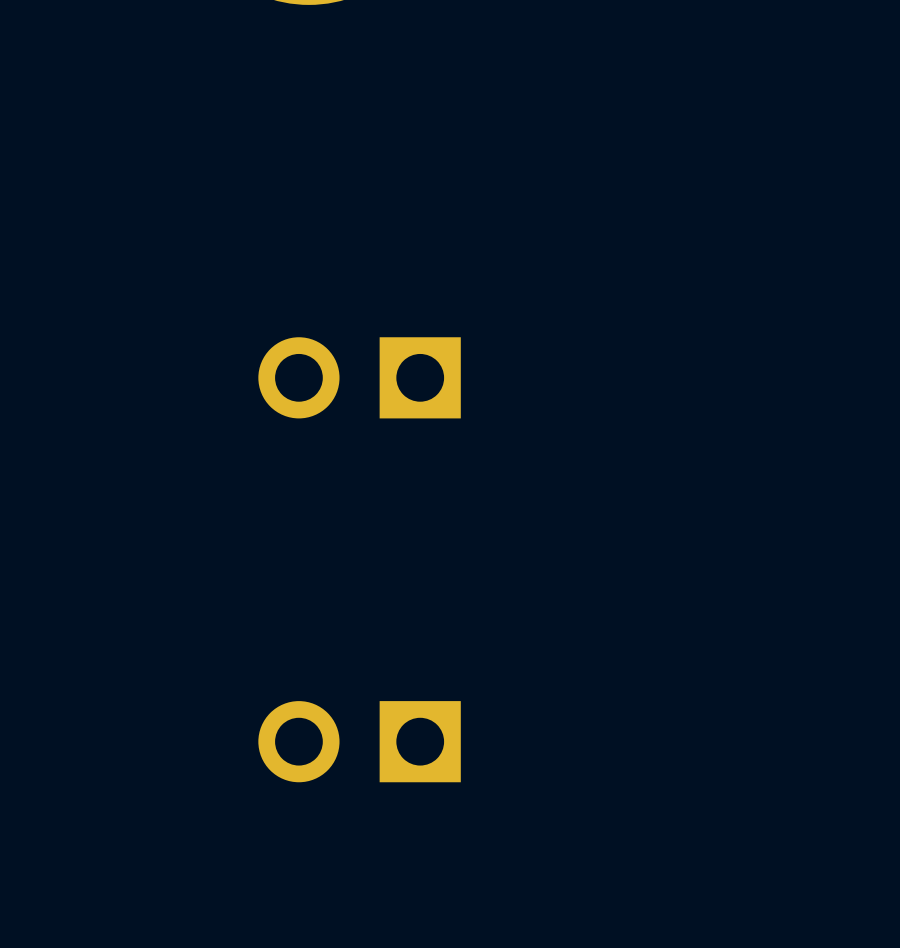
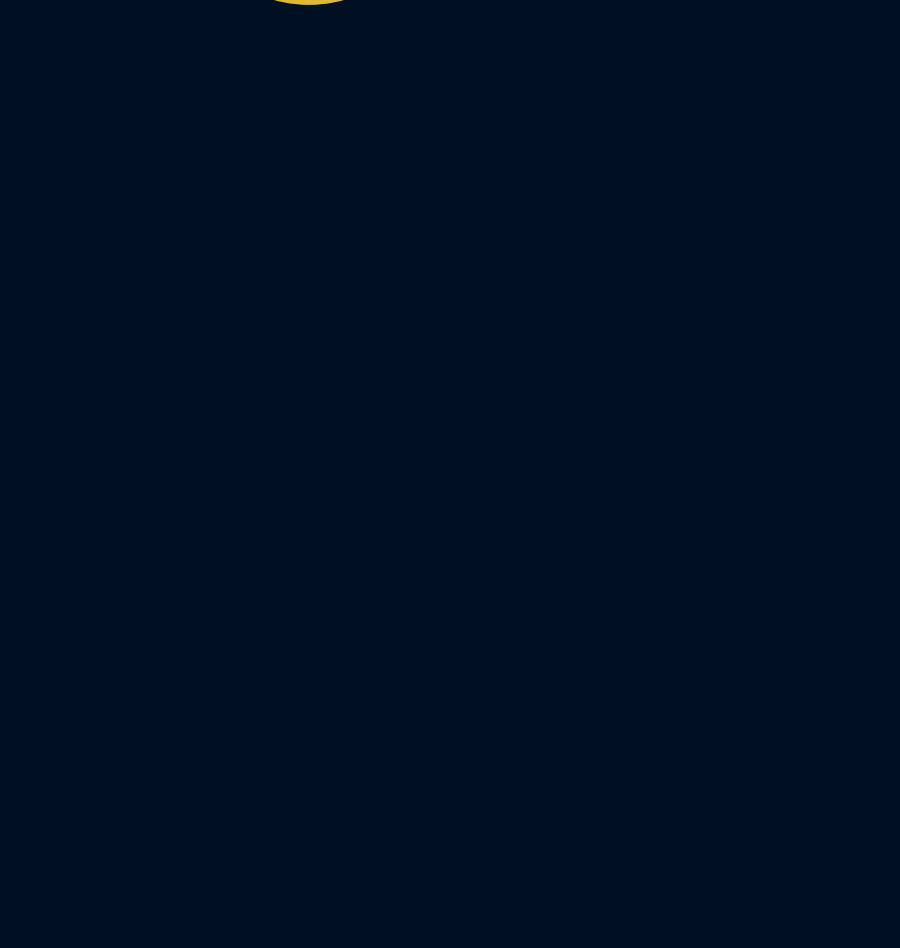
part: (359, 377) -> none
part: (359, 741) -> none

